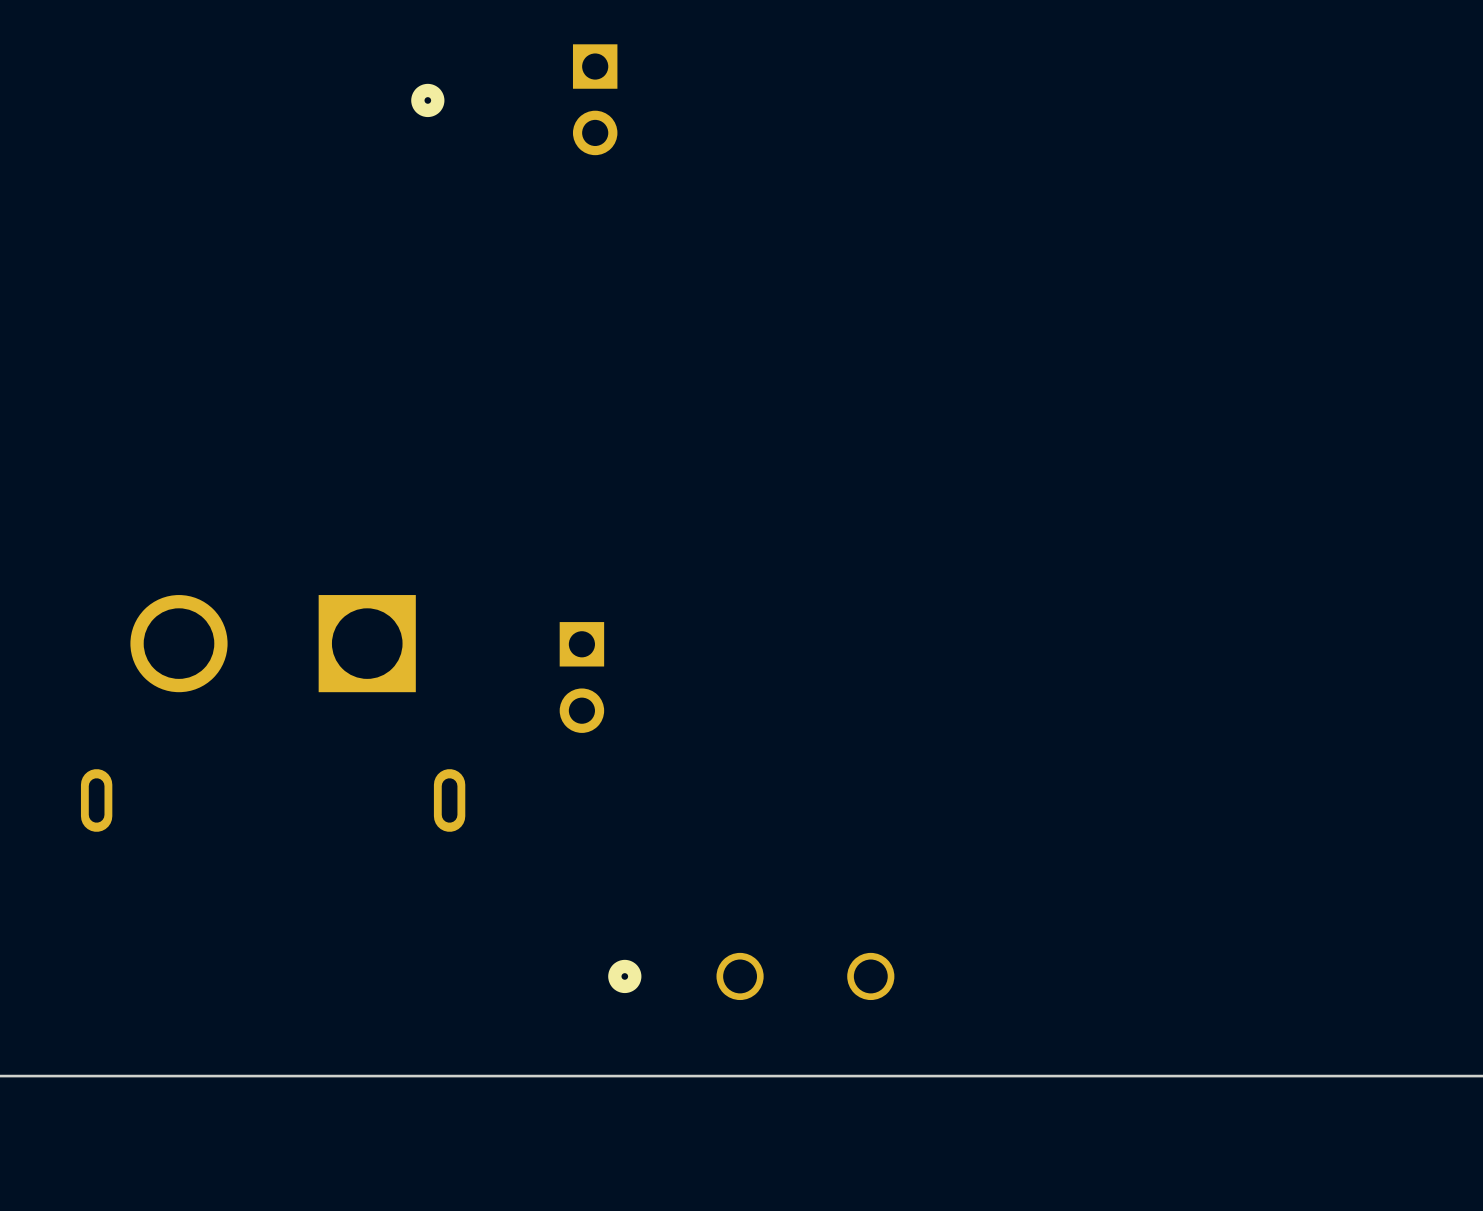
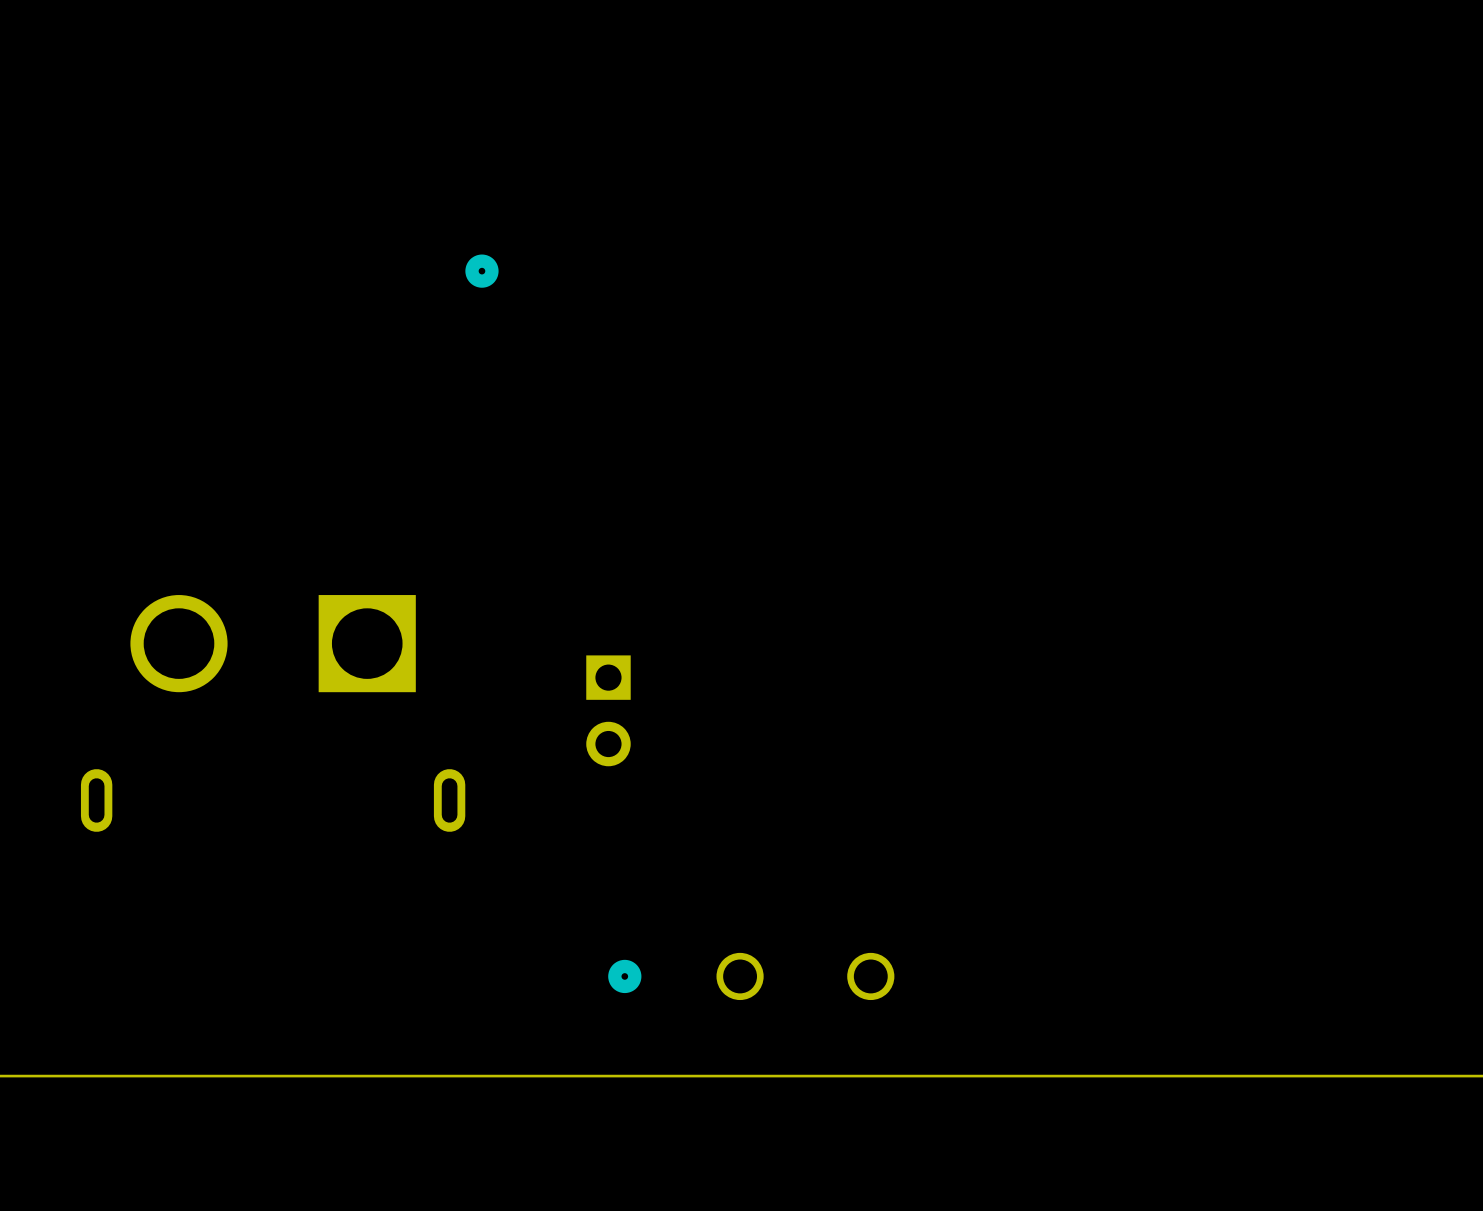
part: (595, 99) -> none
part position: (427, 100) -> (481, 271)
part position: (581, 677) -> (608, 710)

